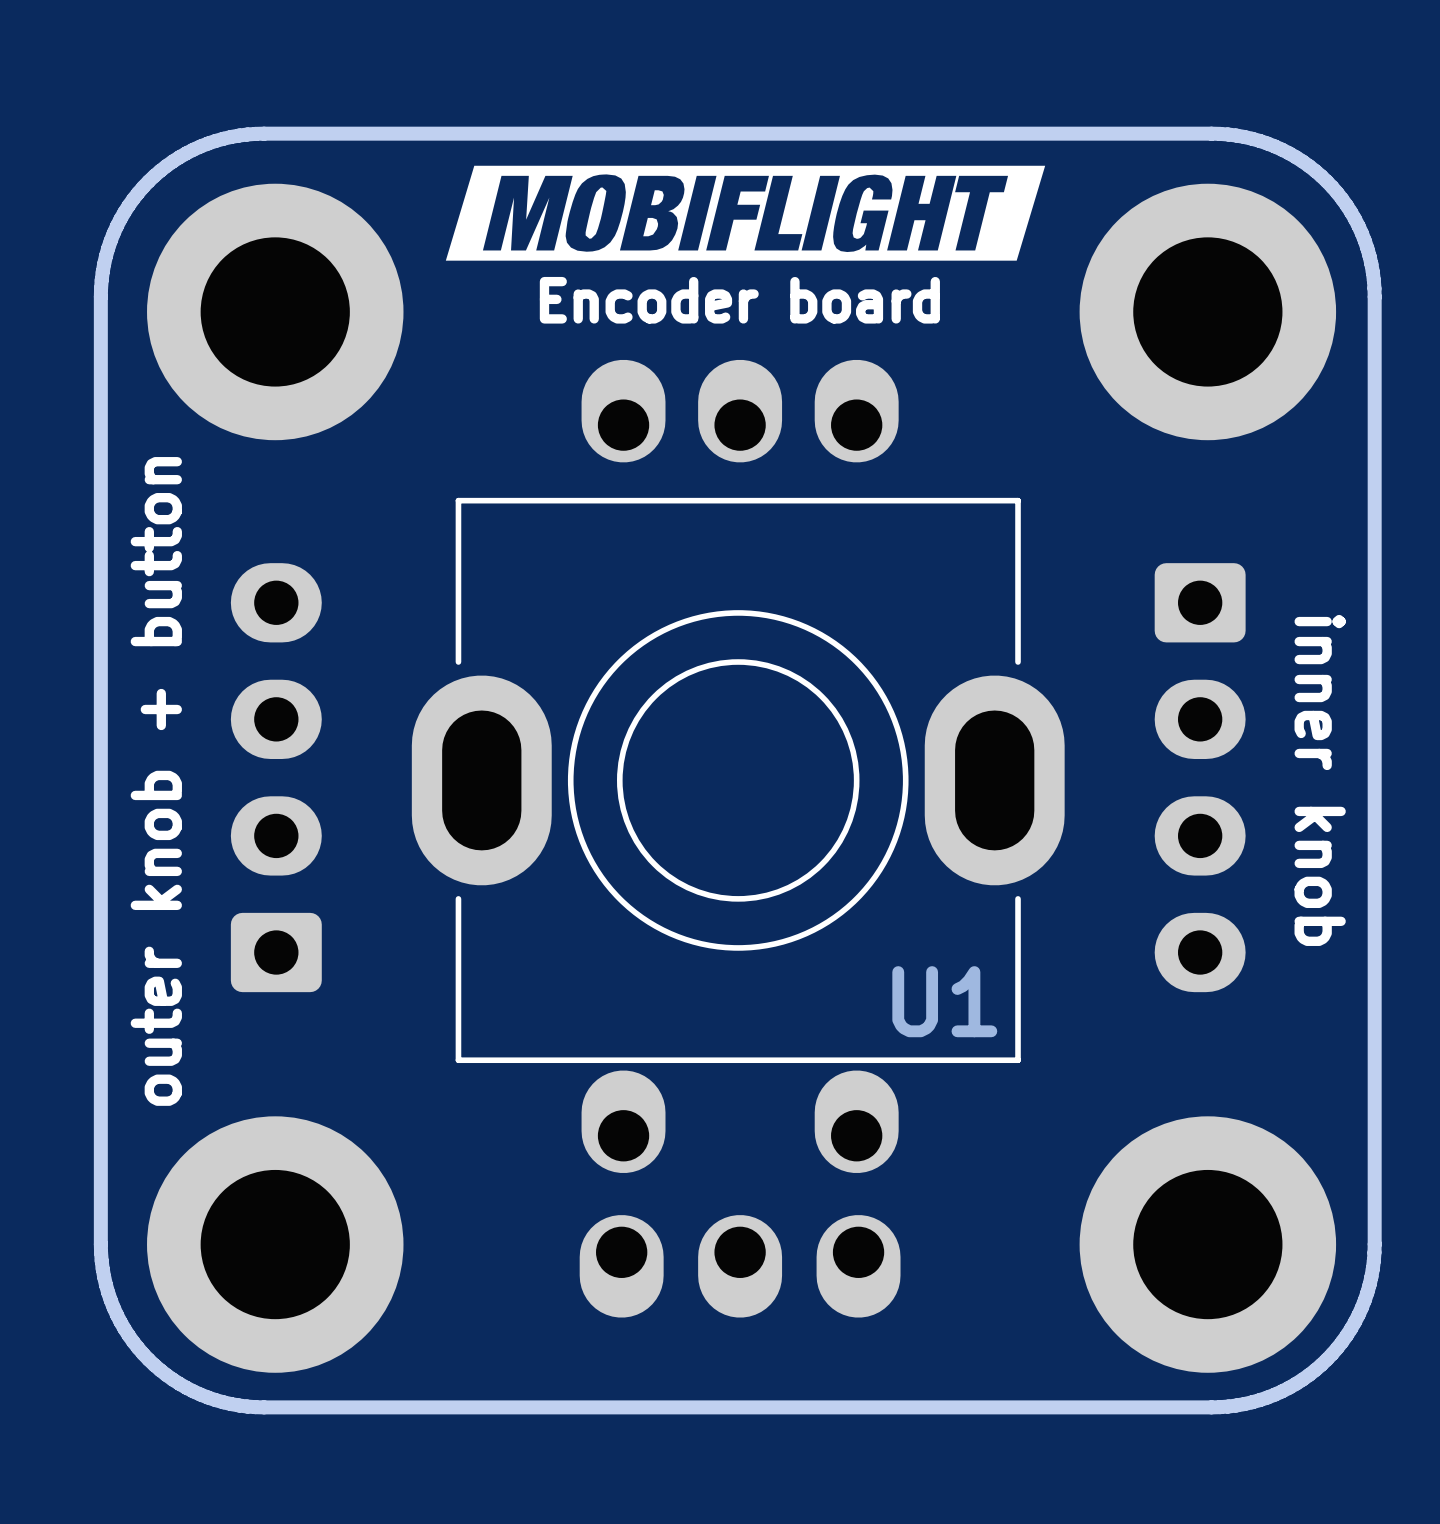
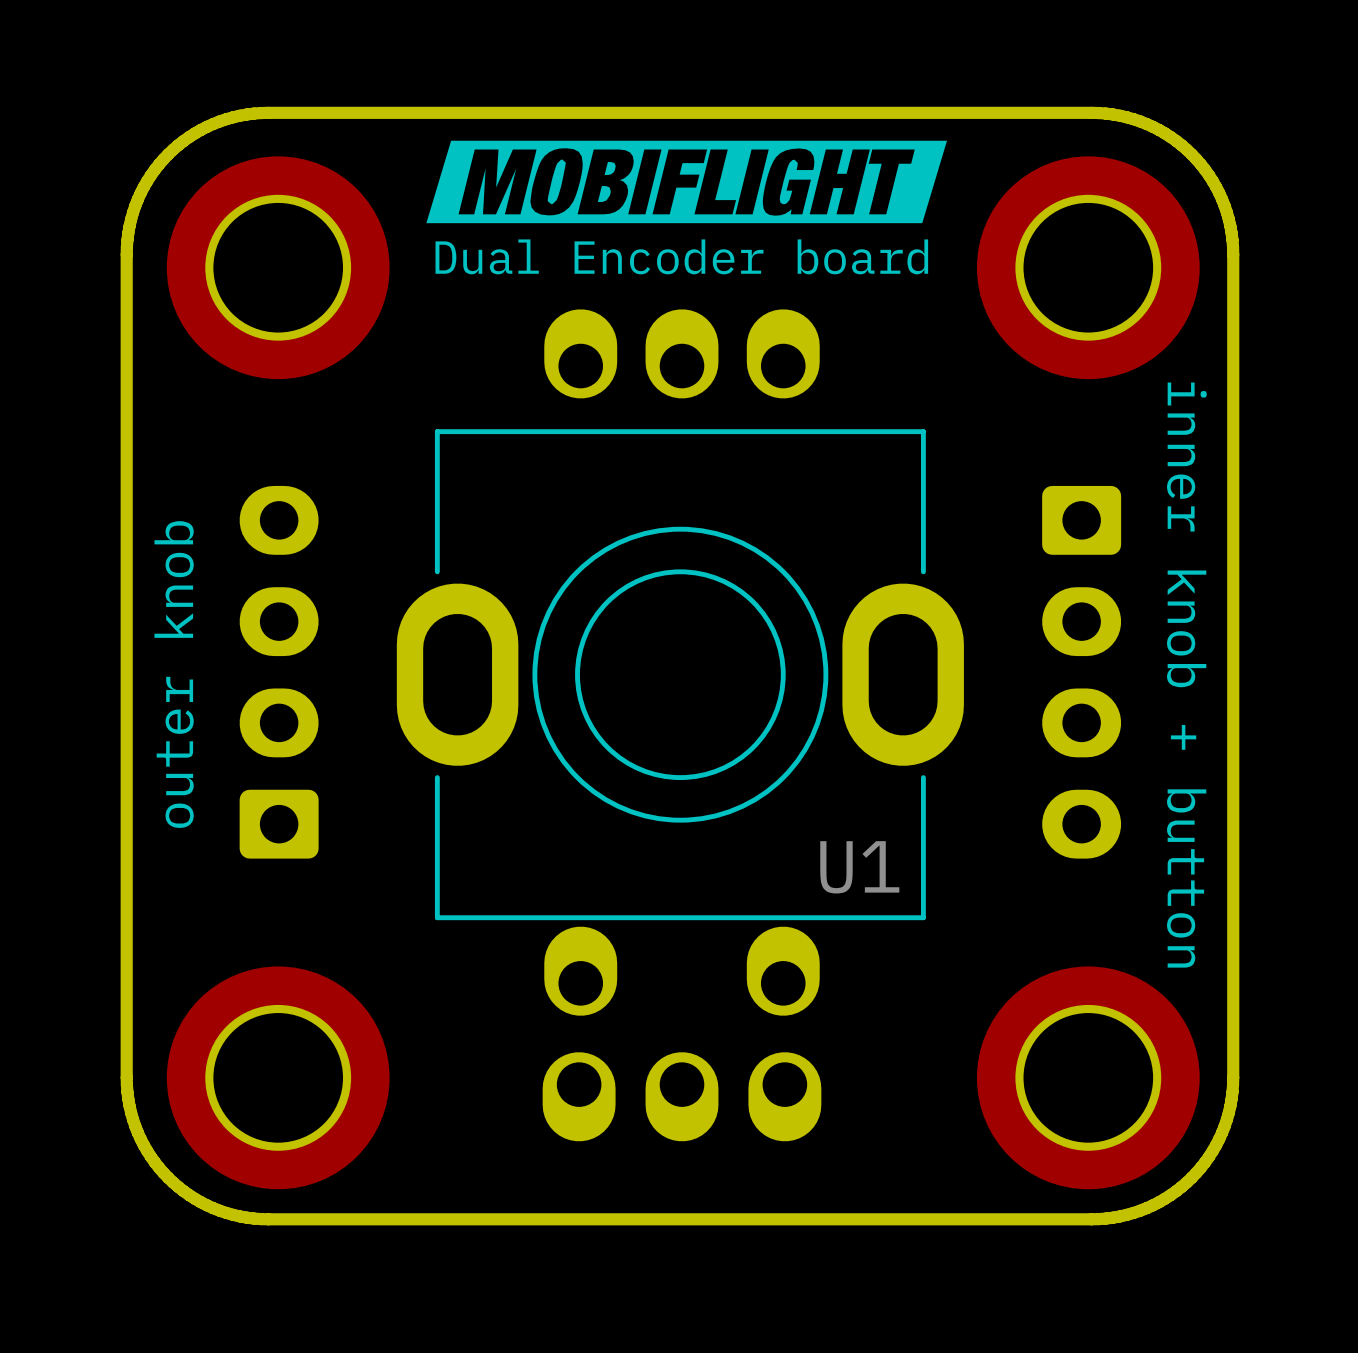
text: Encoder board (739, 300) -> Dual Encoder board (681, 256)
text: inner knob (1320, 780) -> inner knob + button (1186, 675)
text: outer knob + button (156, 781) -> outer knob (174, 674)

